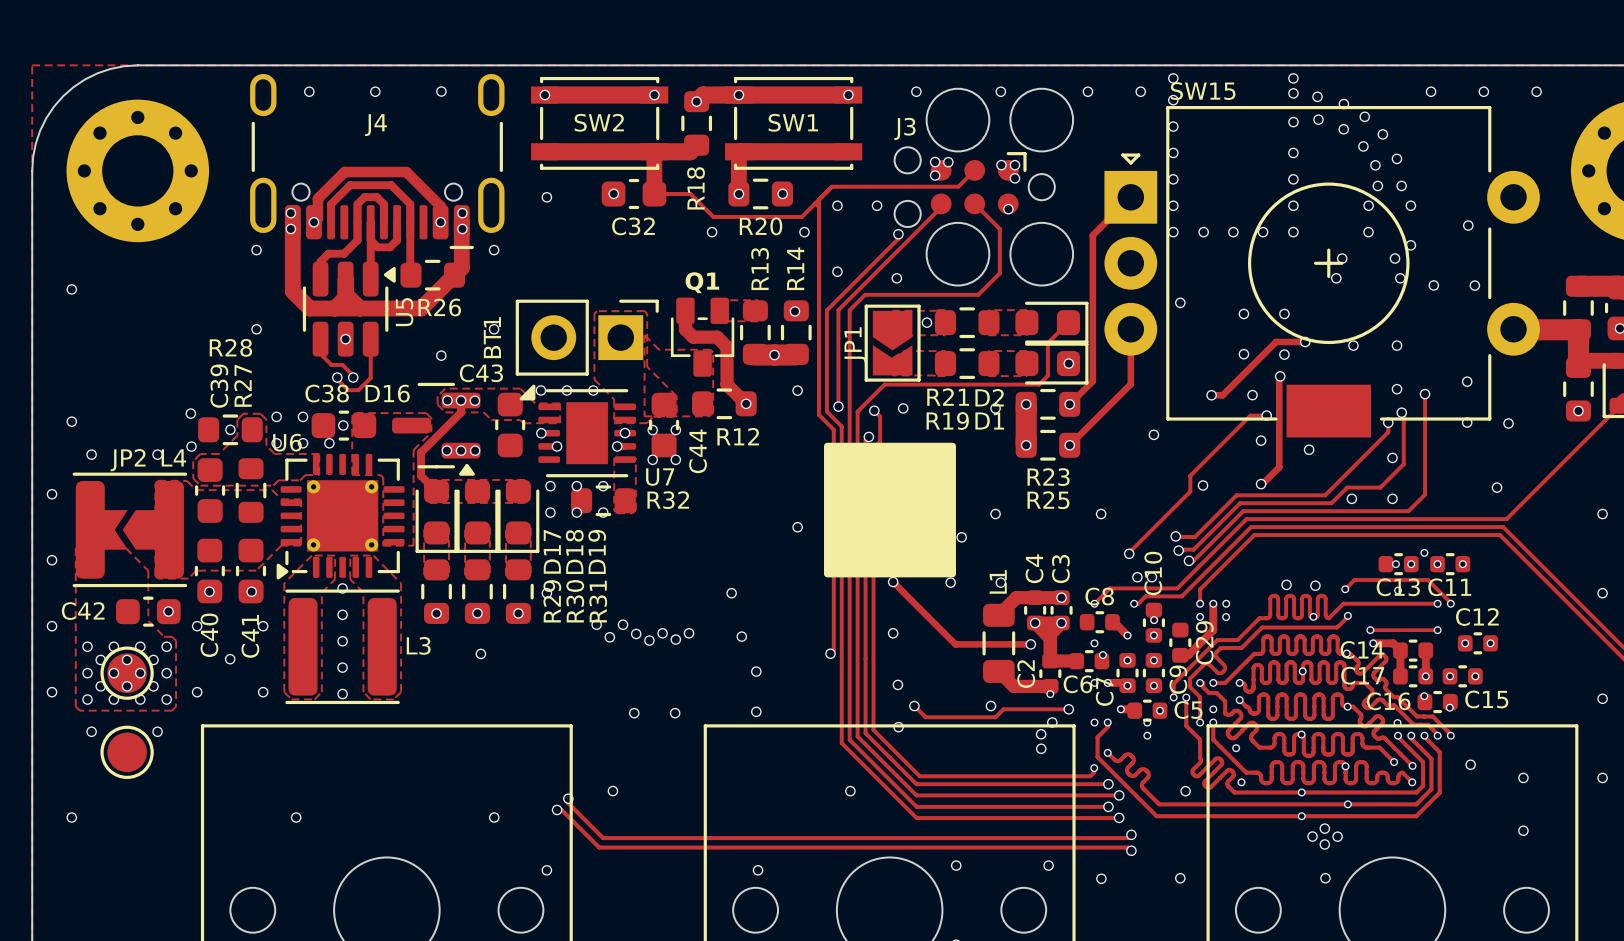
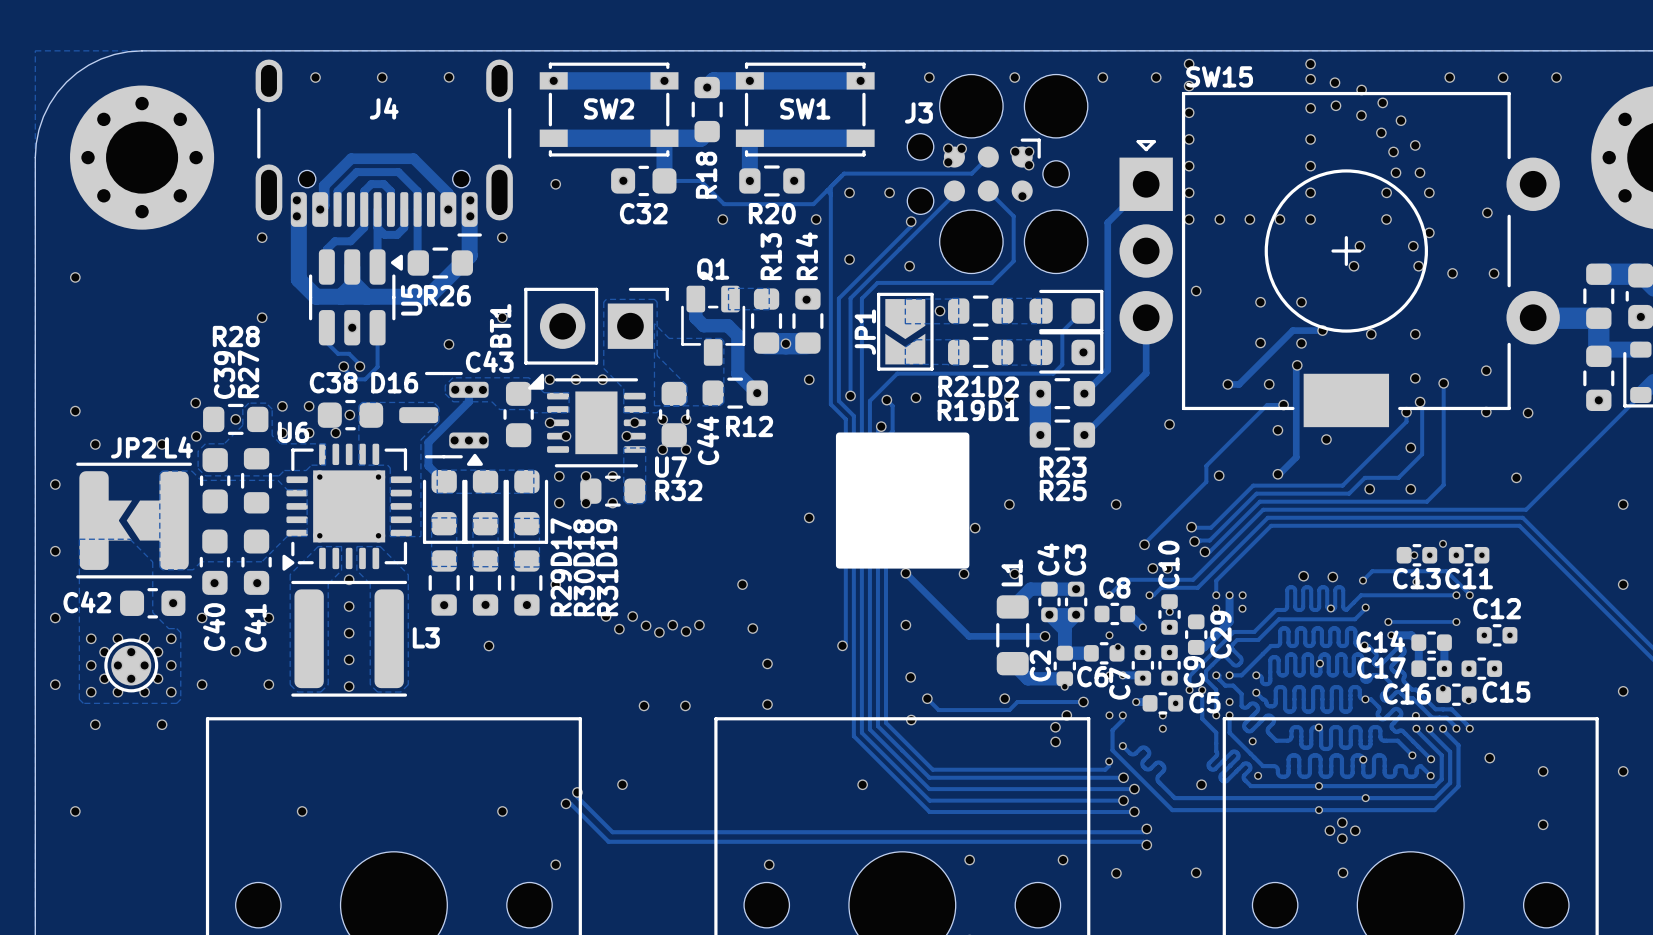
part: (127, 752) -> none

